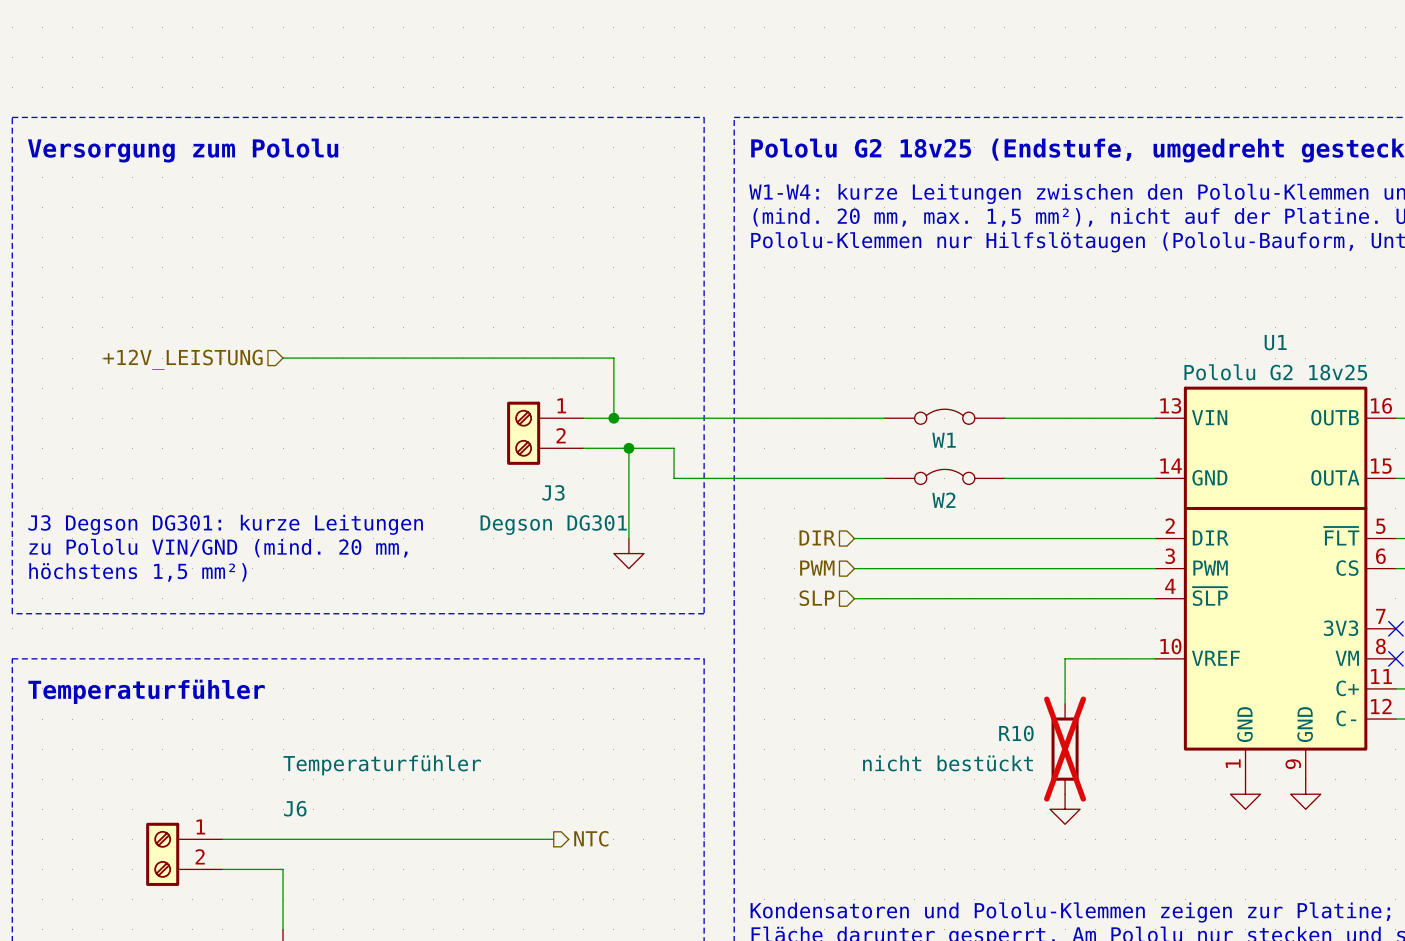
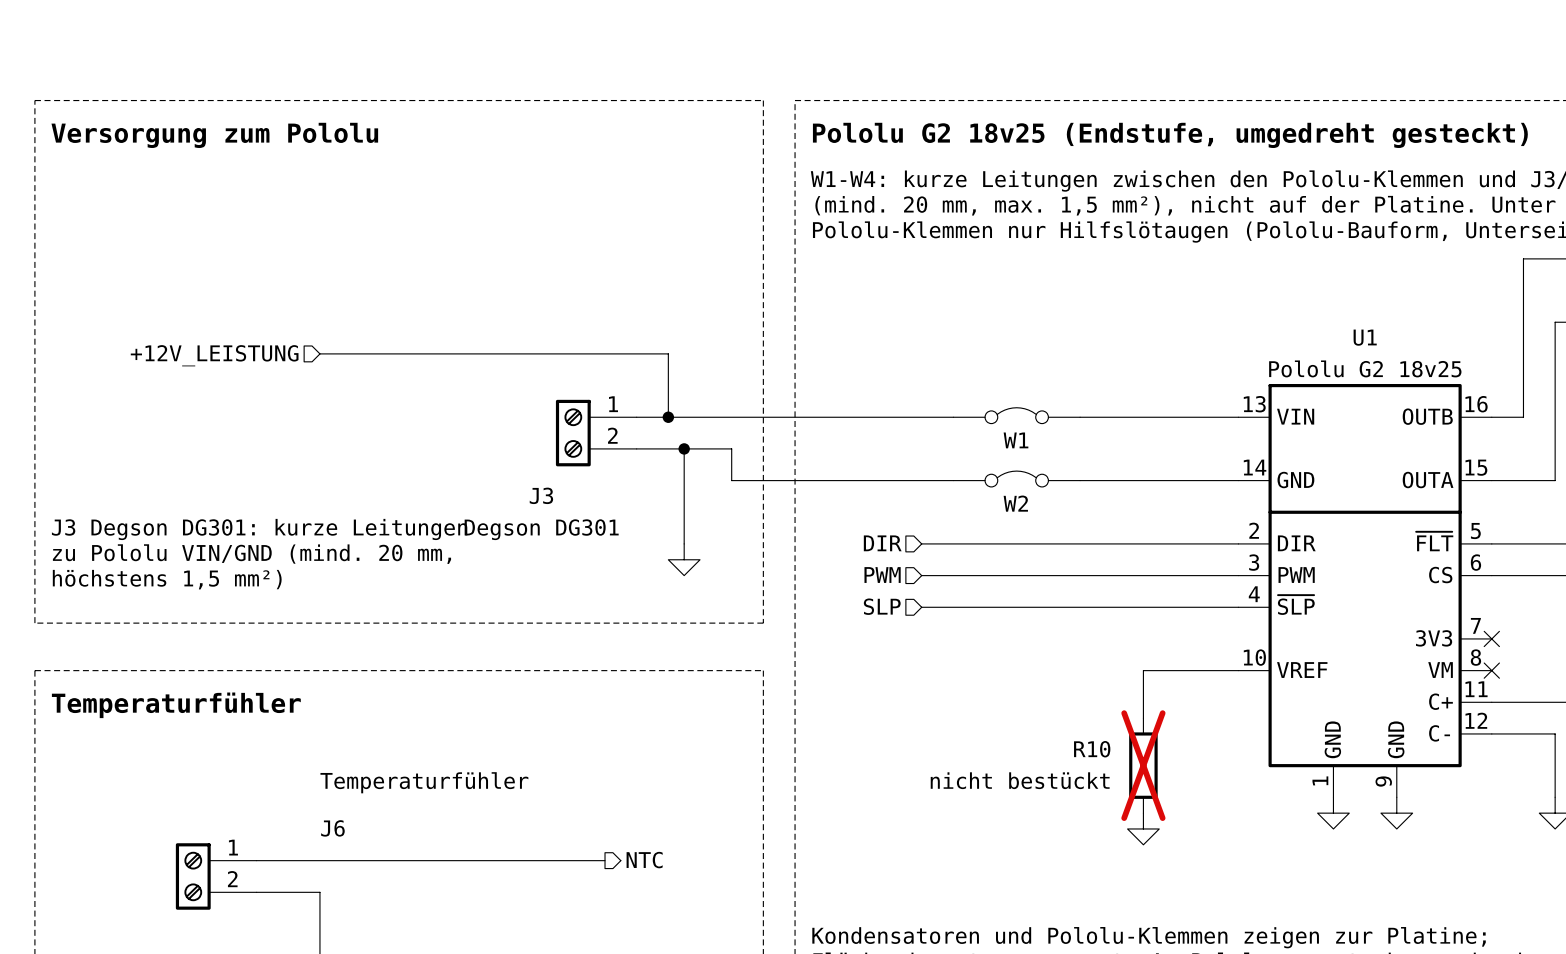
J3 name position: J3 (553, 492) -> J3 (541, 495)
J3 value position: Degson DG301 (553, 525) -> Degson DG301 (541, 529)

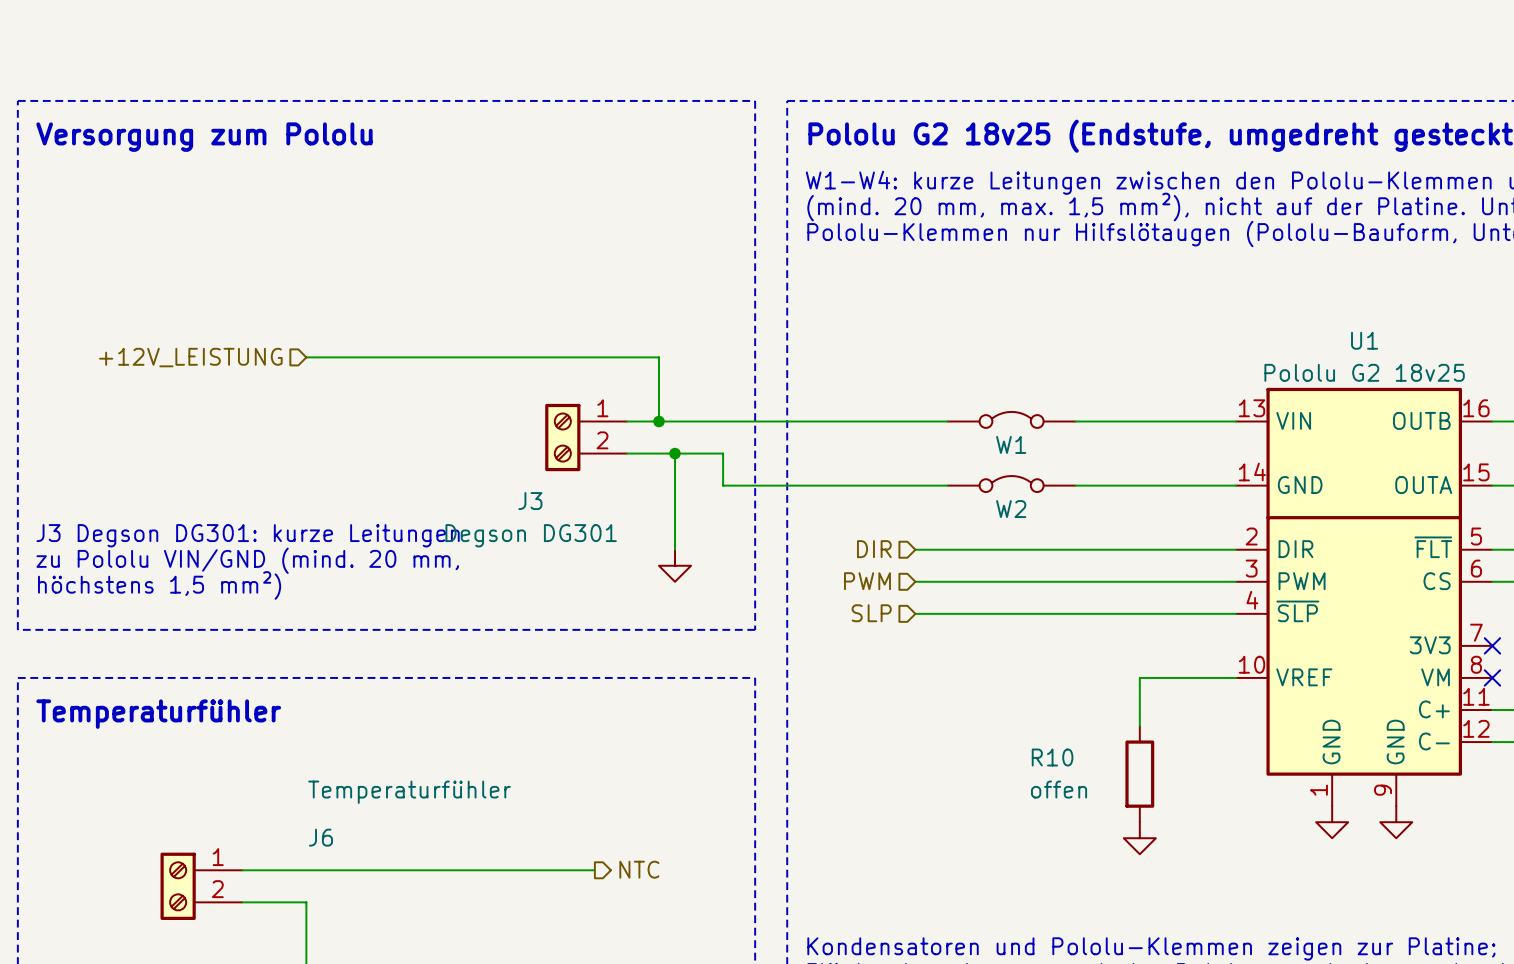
R10 name position: R10 (1092, 749) -> R10 (1052, 757)
R10 do-not-place cross: (1143, 765) -> none
R10 value: nicht bestückt (1020, 780) -> offen (1059, 789)

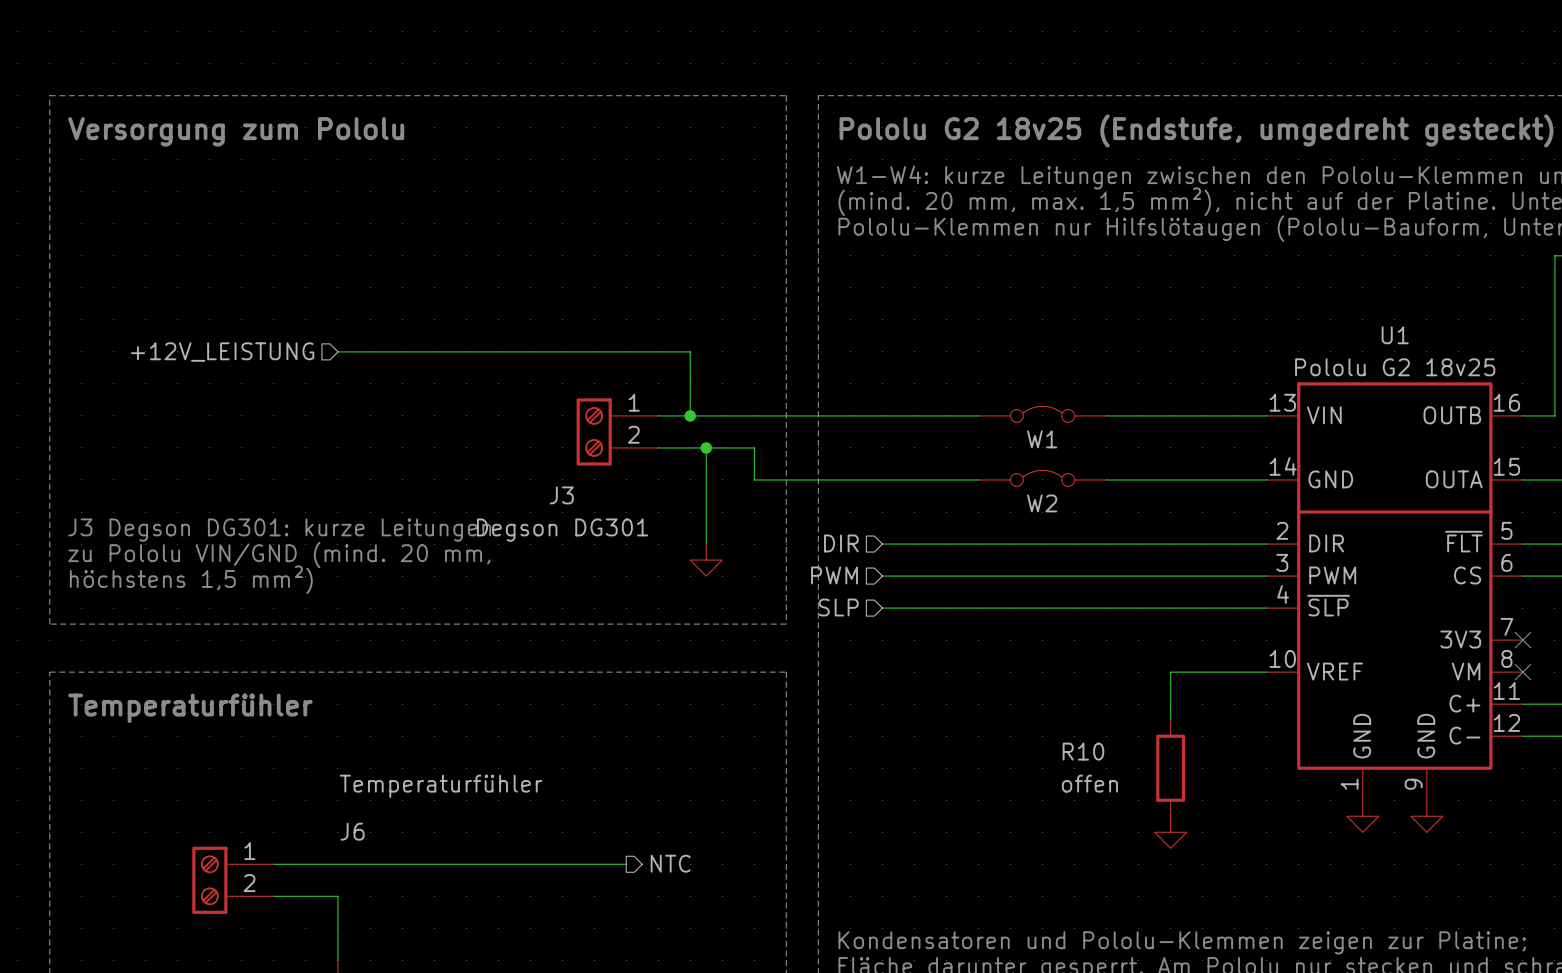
wire: none -> (882, 544) (946, 544)
hierarchical label position: DIR (874, 549) -> DIR (841, 543)
wire: none -> (882, 576) (946, 576)
hierarchical label position: PWM (867, 581) -> PWM (834, 575)
wire: none -> (882, 608) (946, 608)
hierarchical label position: SLP (871, 613) -> SLP (838, 607)

